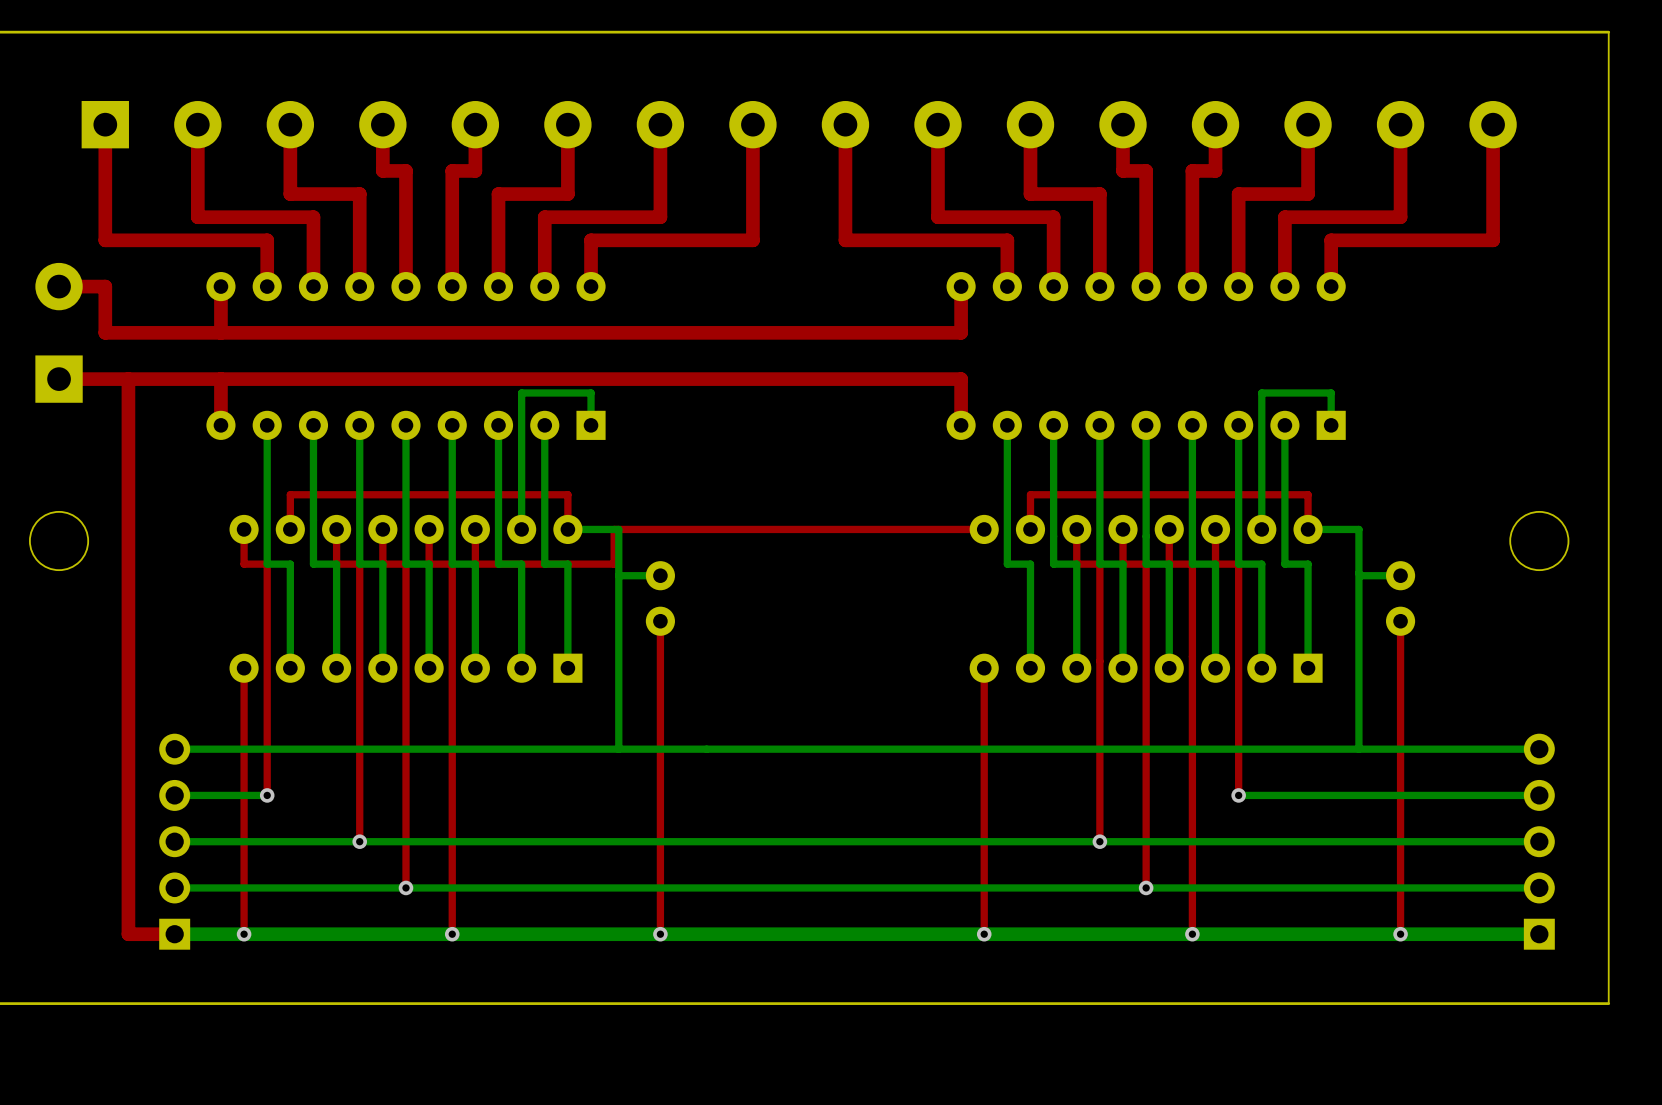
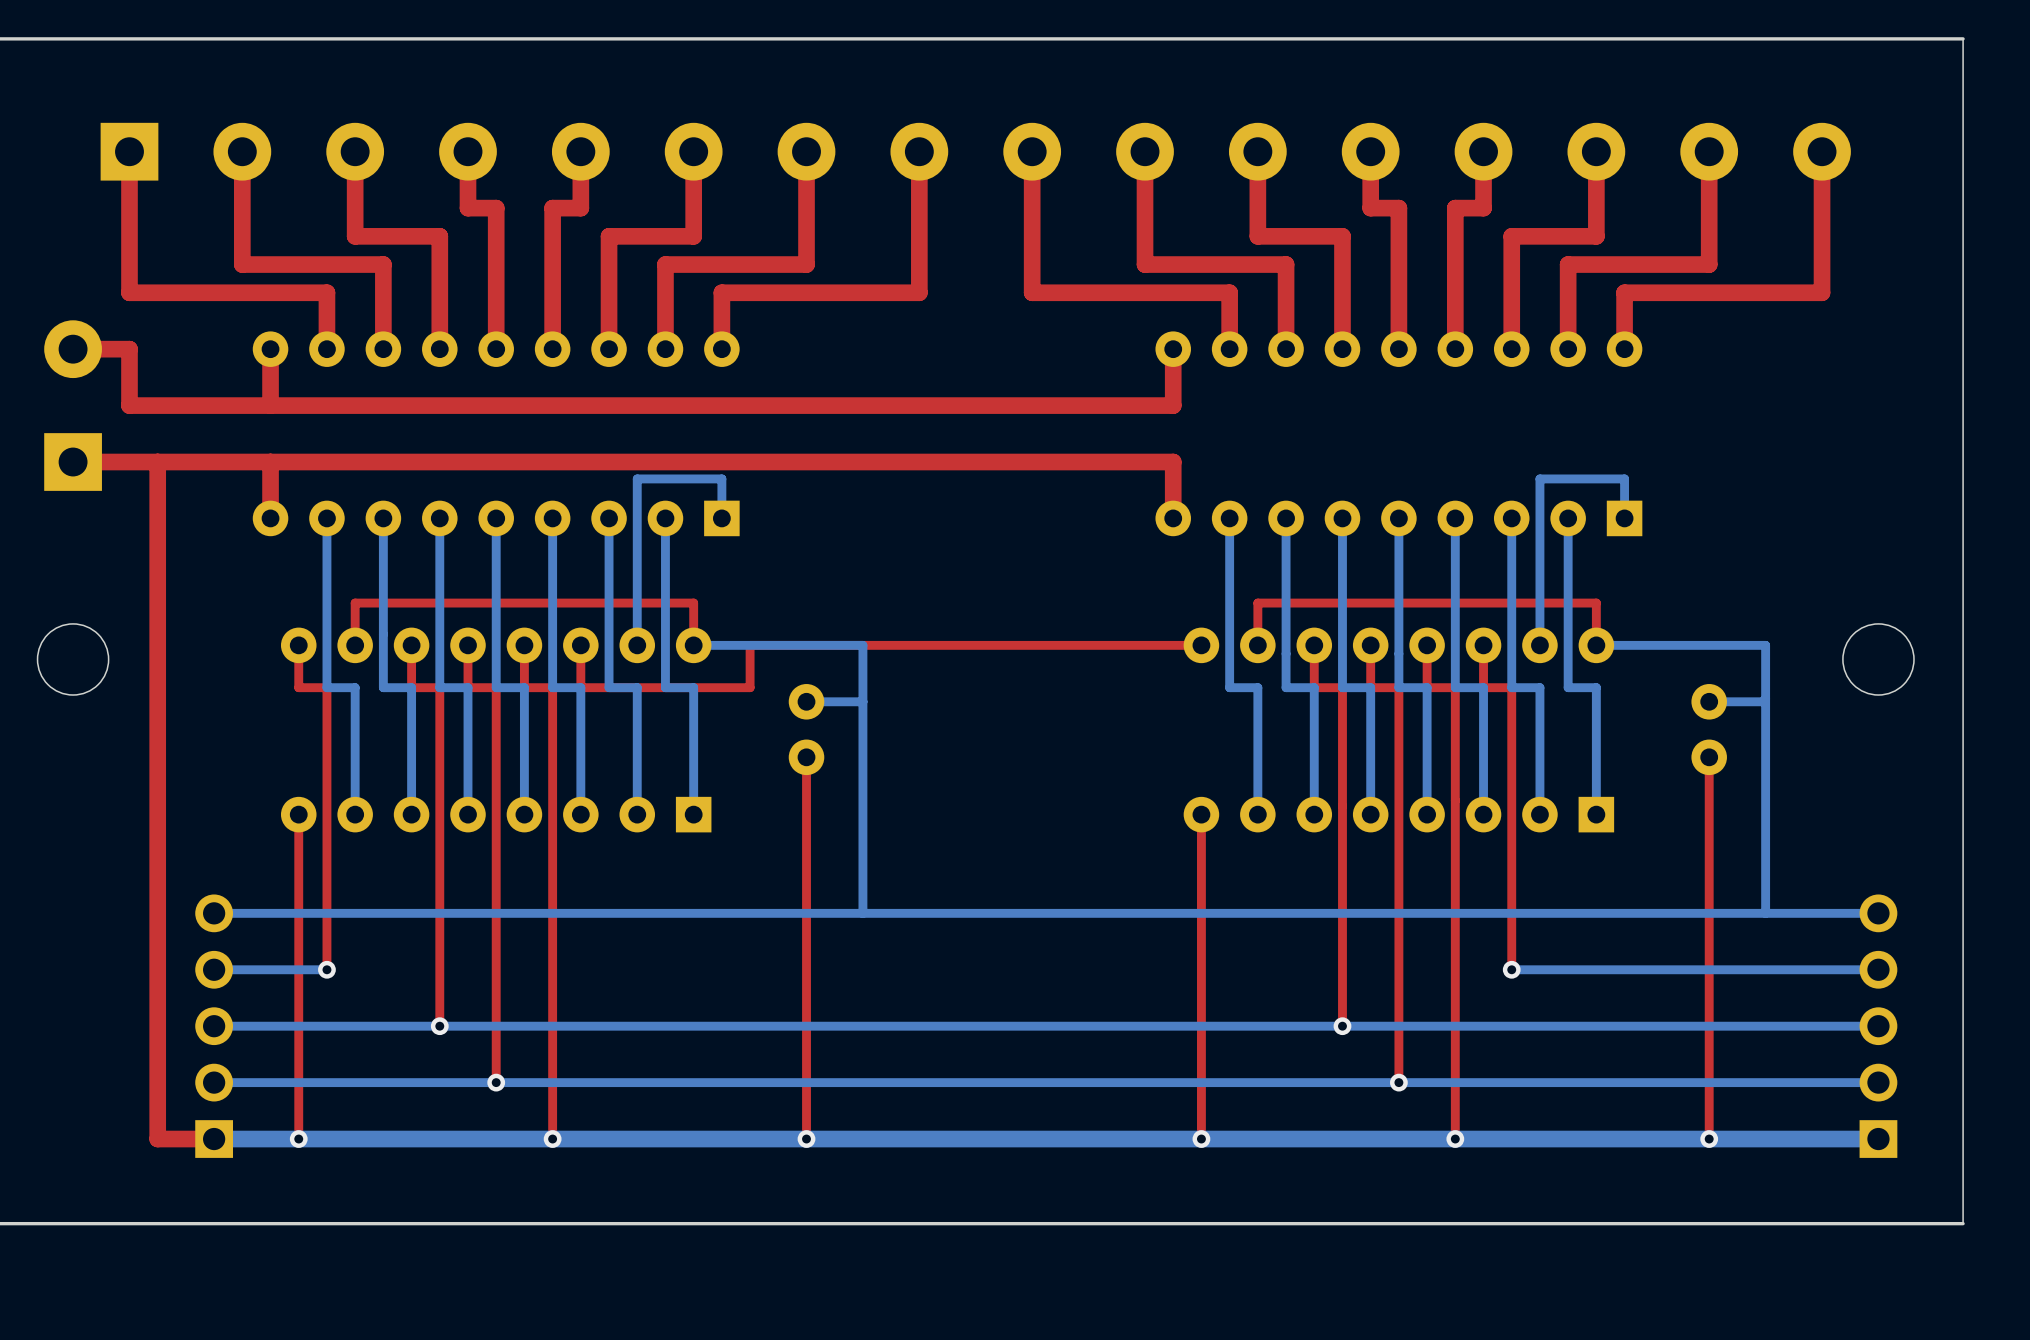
bottom track: (618, 529) (618, 749) -> (755, 645) (862, 645) (862, 913)
bottom track: (1358, 529) (1358, 749) -> (1658, 645) (1765, 645) (1765, 913)
bottom track: (1358, 573) (1361, 575) (1400, 575) -> (1765, 698) (1762, 701) (1709, 701)
bottom track: (660, 575) (618, 575) -> (806, 701) (862, 701)

